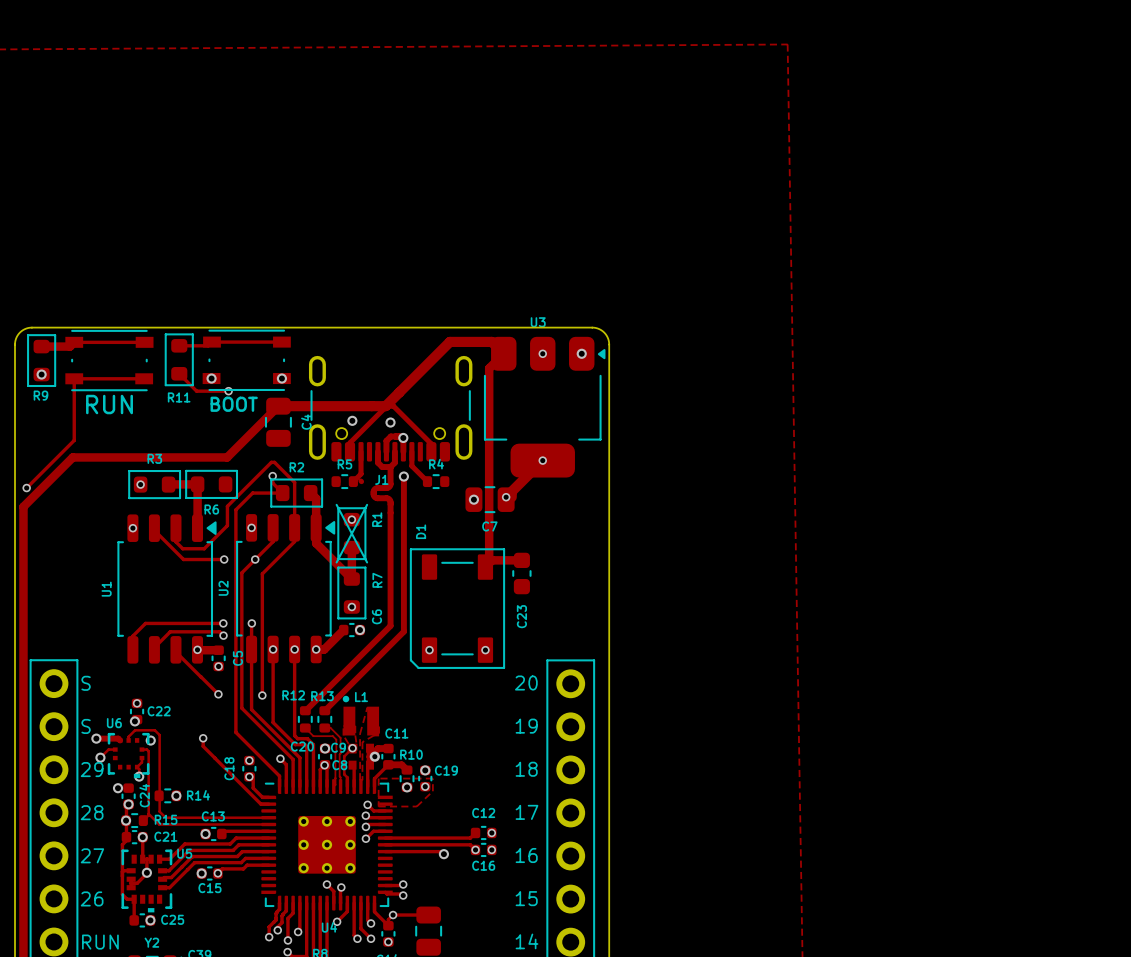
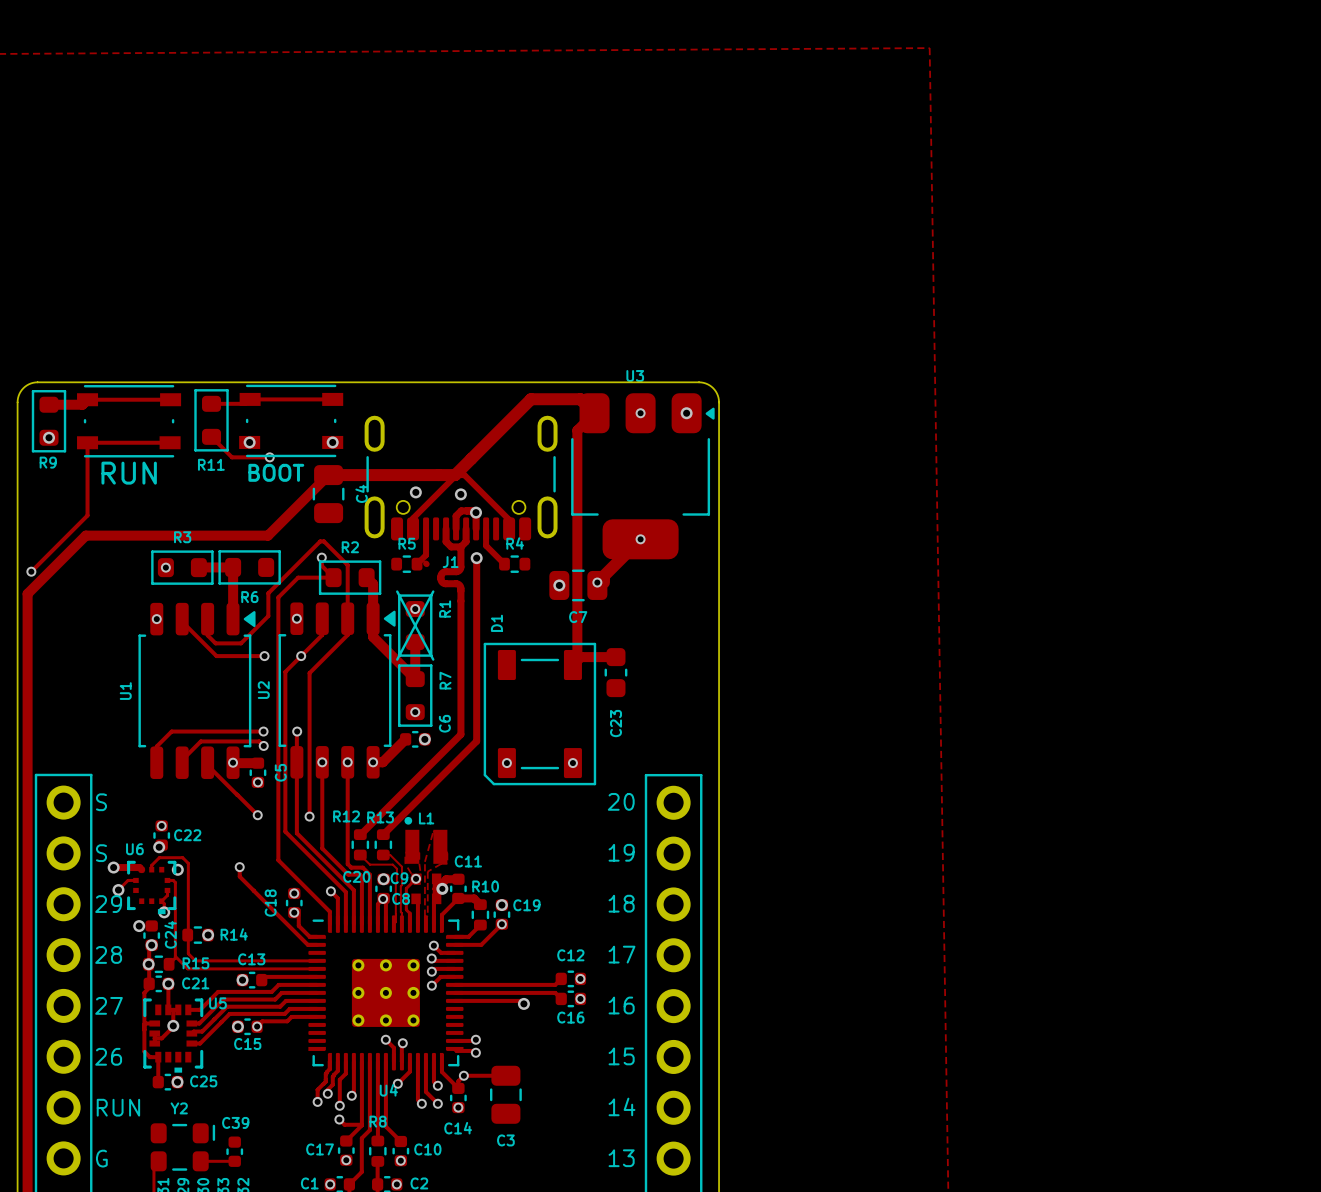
zone outline: (378, 778) (378, 806) (416, 806) (432, 791) (432, 778) (378, 778) -> none
track: none -> (501, 924) (481, 944) (454, 944)
track: none -> (480, 925) (468, 936) (454, 936)
via: (407, 787) -> none
via: (475, 849) -> none

